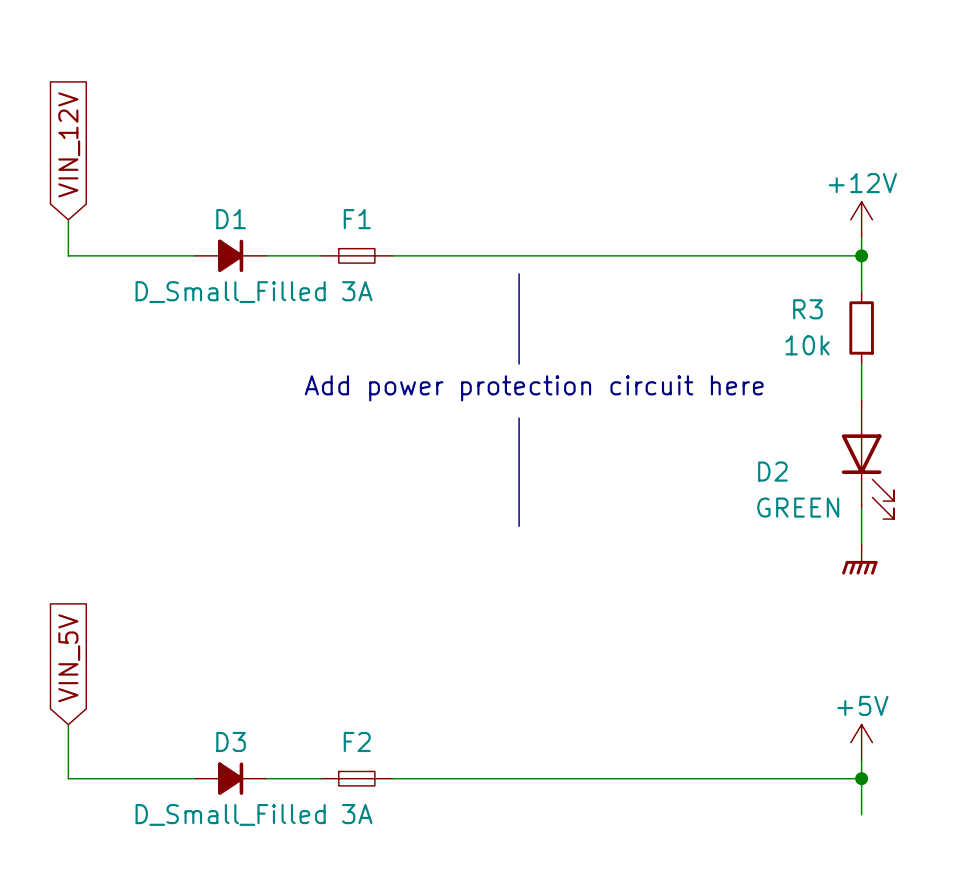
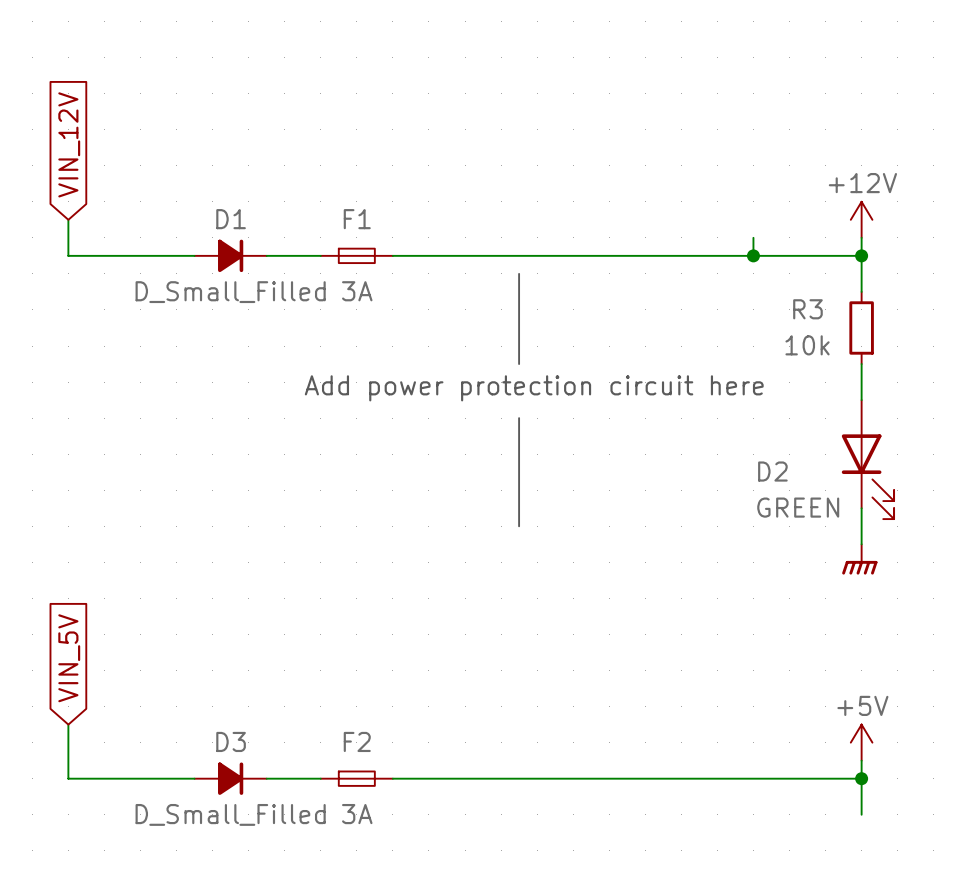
wire: none -> (753, 237) (753, 255)
junction: none -> (753, 255)

